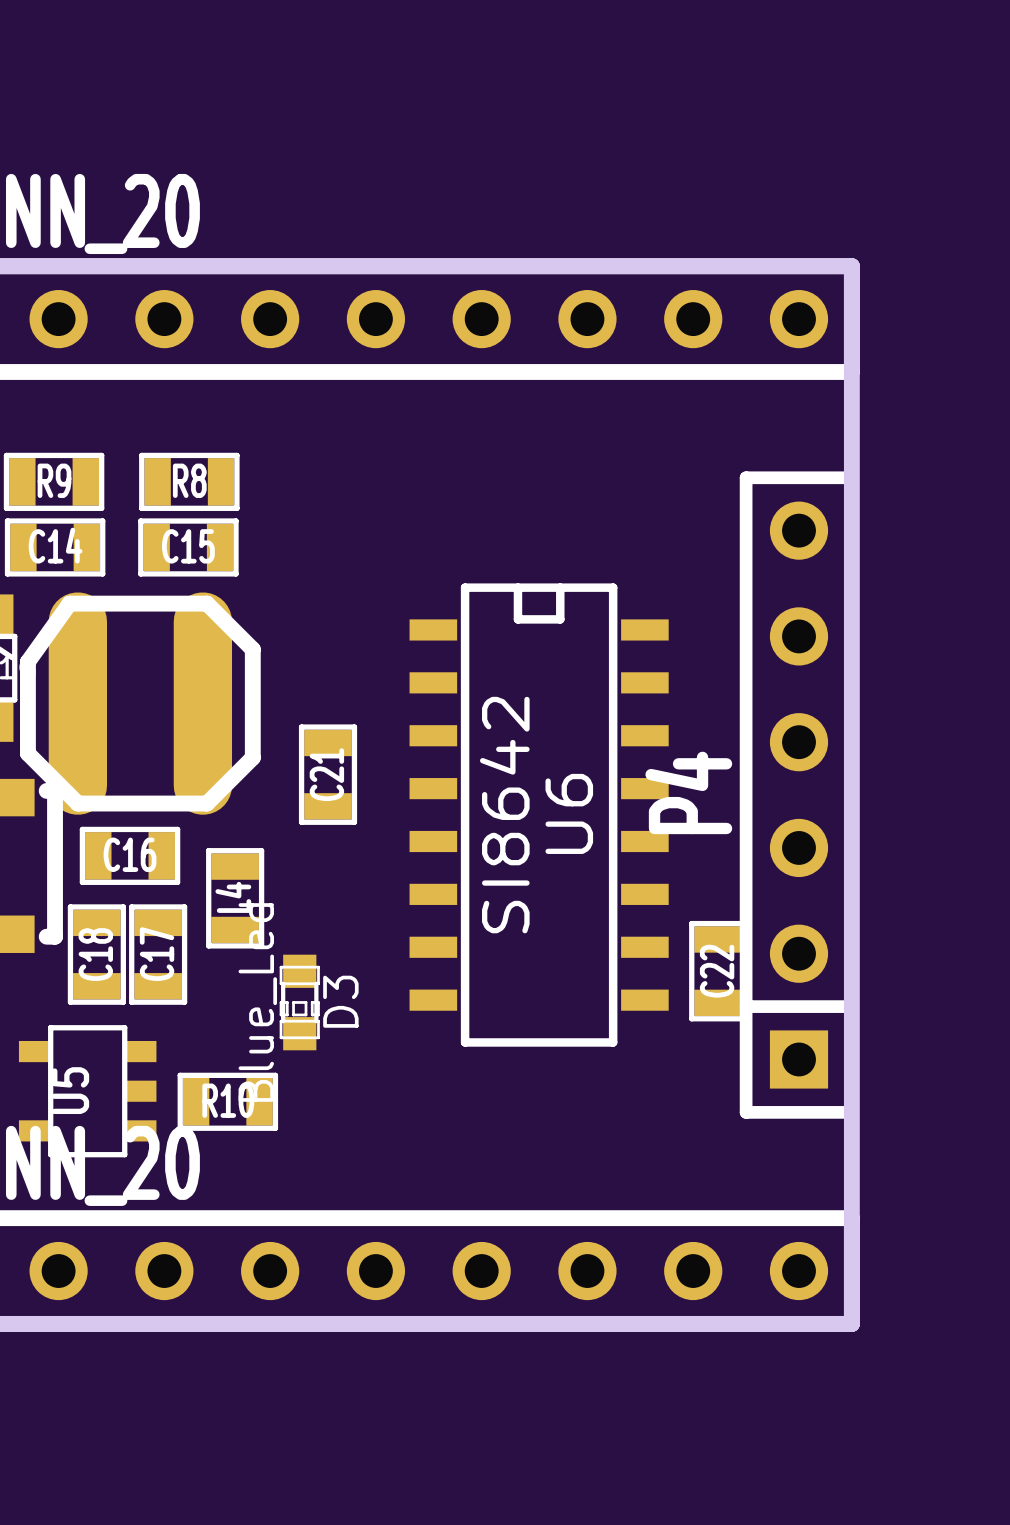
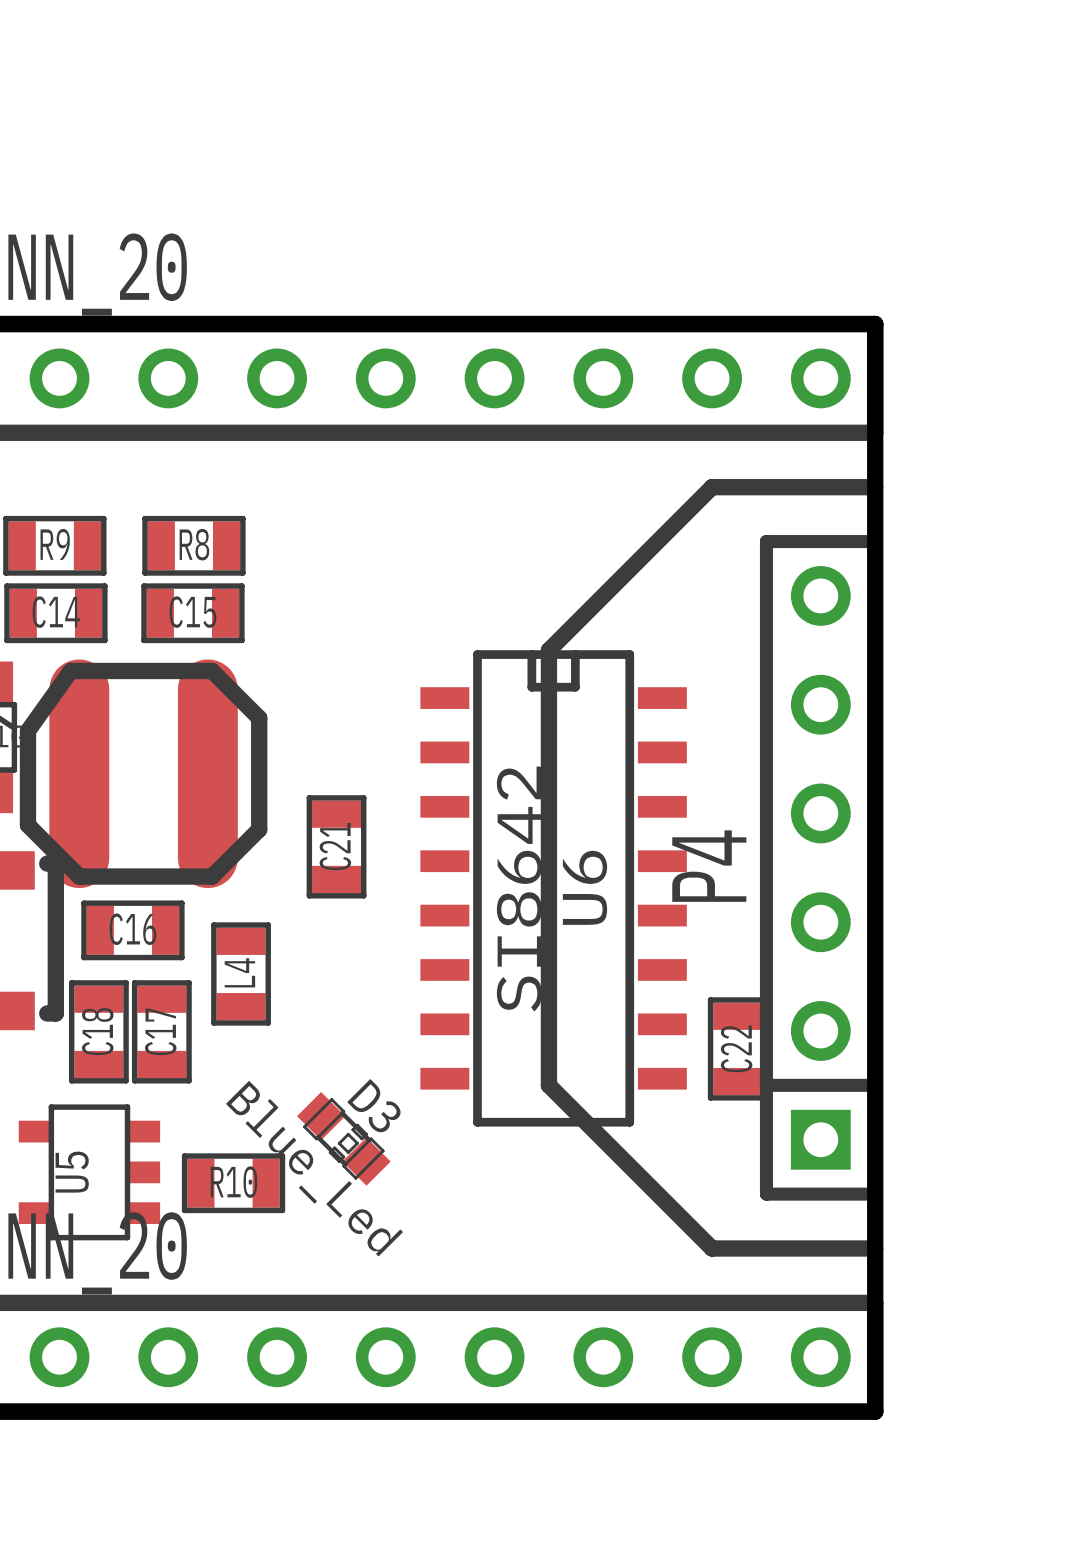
line: none -> (875, 487) (712, 487) (548, 650) (548, 1085) (712, 1248) (875, 1248)
D3 rotation: 0° (299, 1002) -> 45° counterclockwise (343, 1138)
D3 position: (299, 1002) -> (343, 1138)

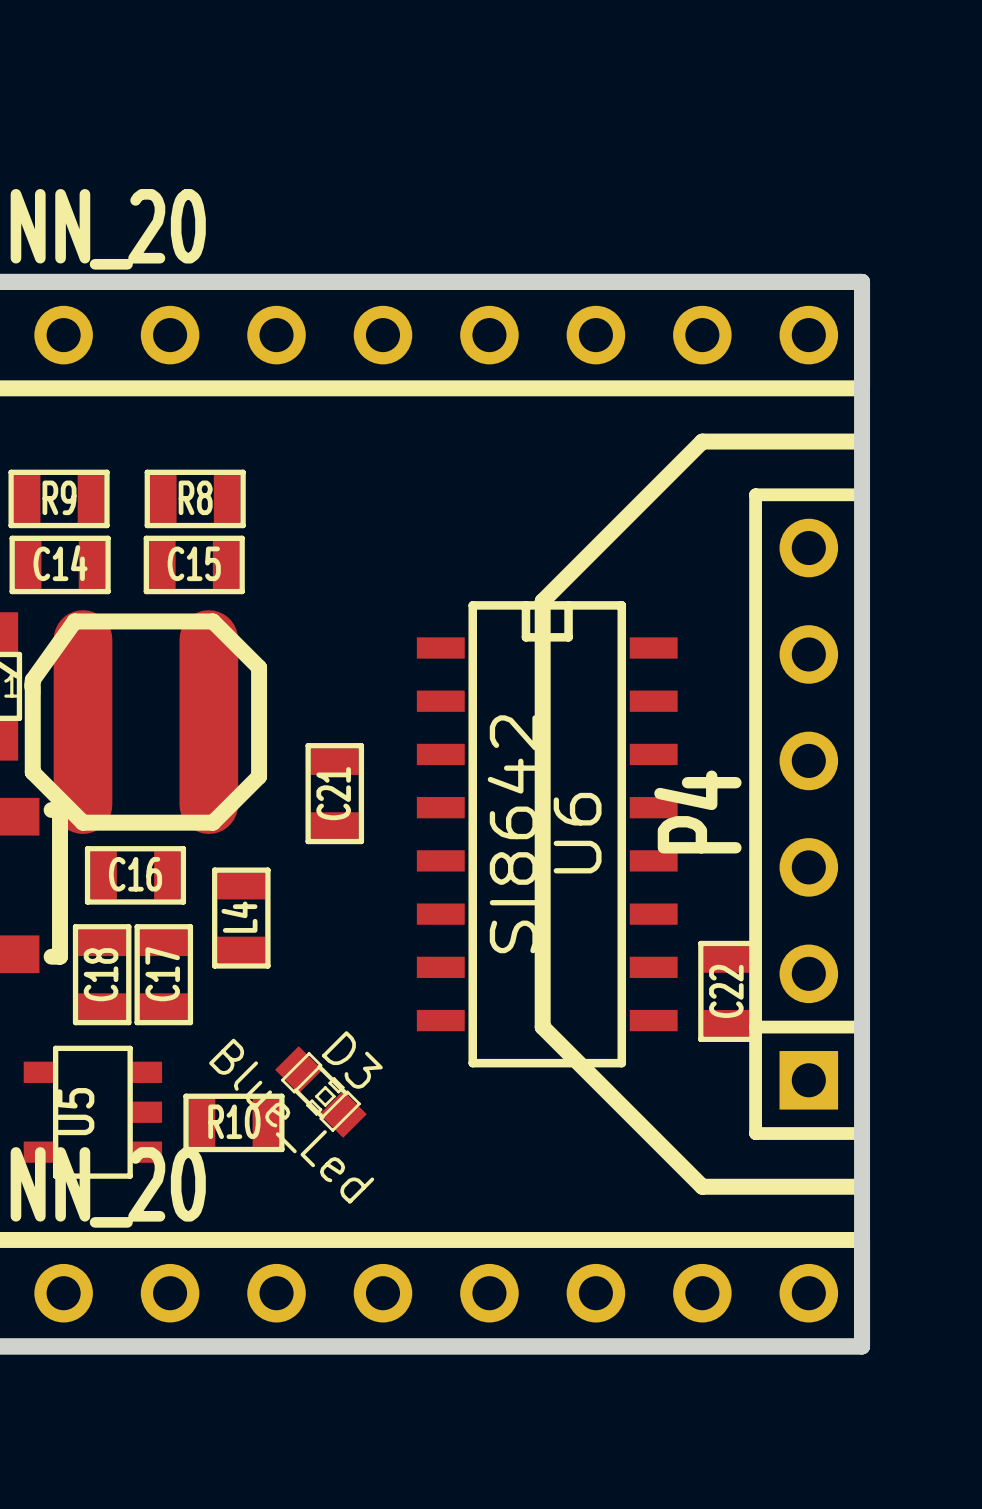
D3 position: (343, 1138) -> (320, 1092)

